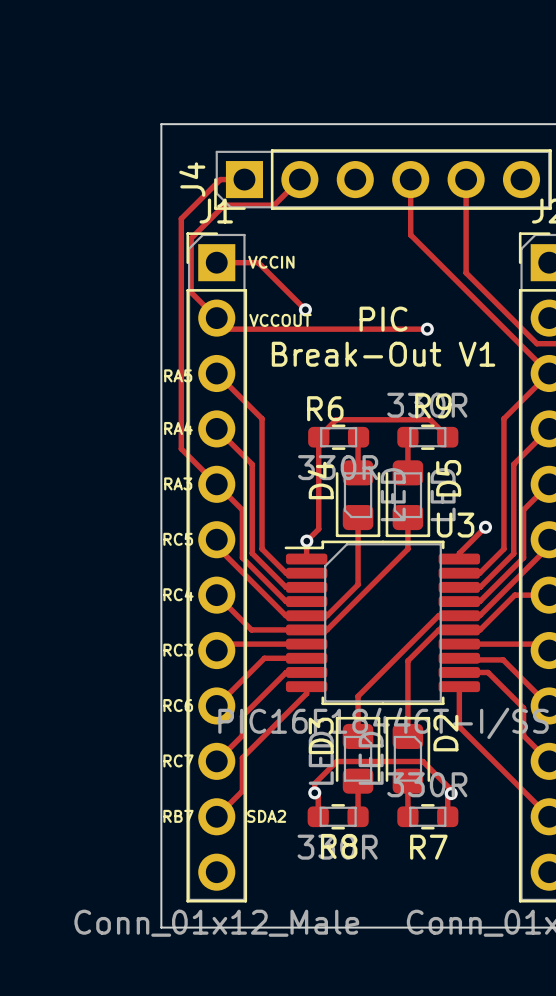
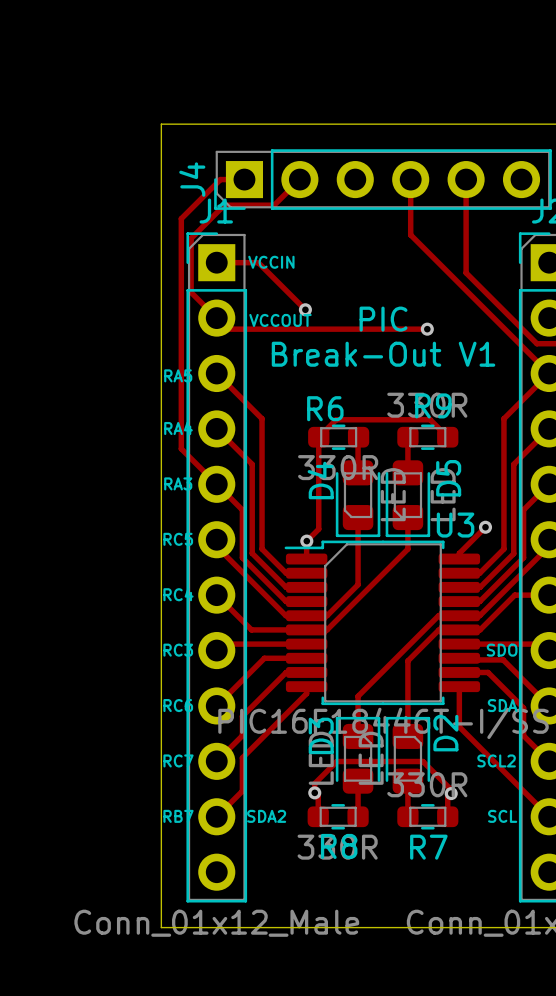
text: none -> SDO (502, 650)
text: none -> SDA (502, 705)
text: none -> SCL2 (496, 760)
text: none -> SCL (502, 816)

